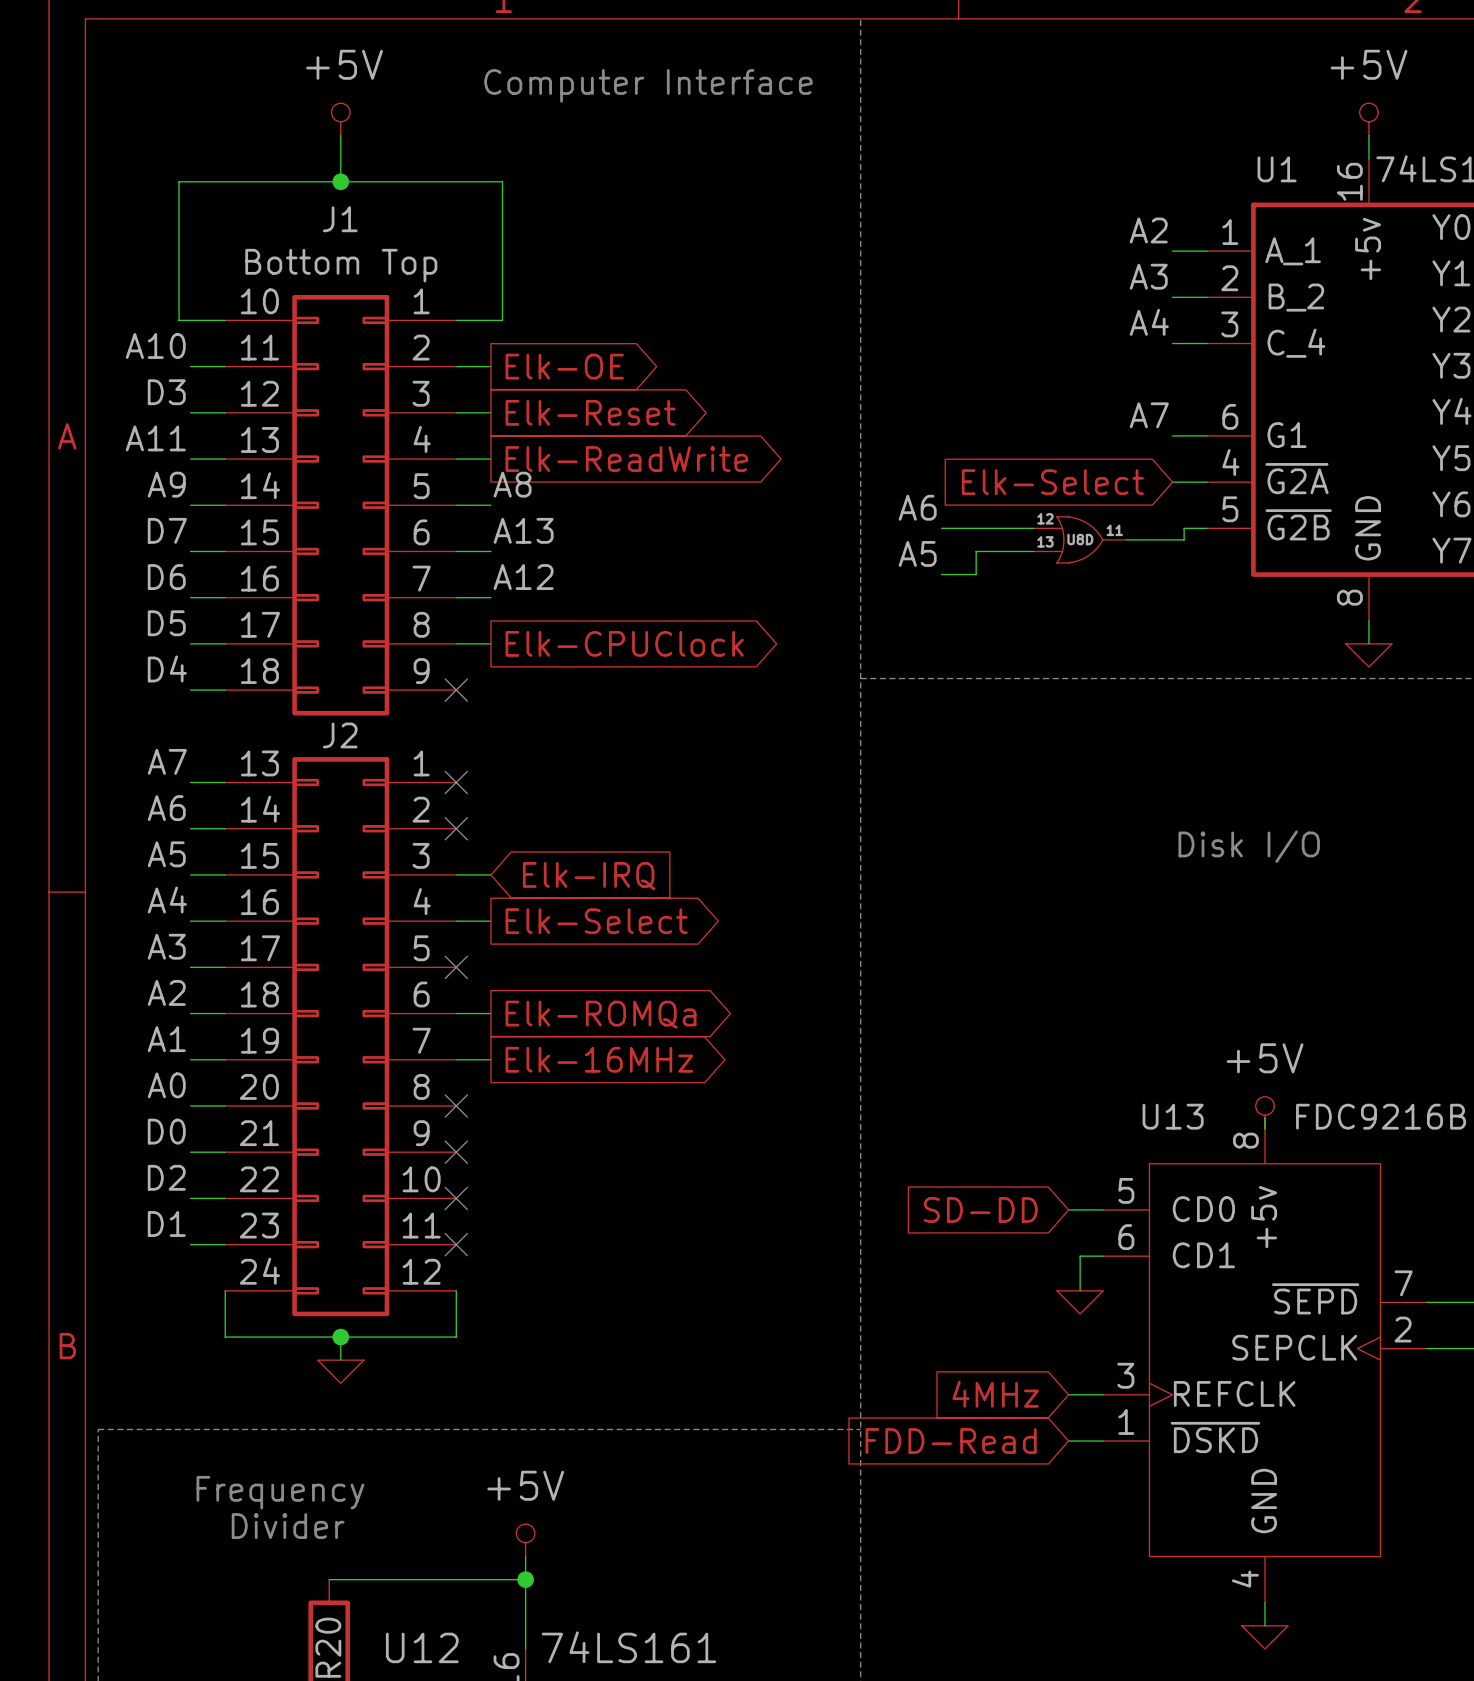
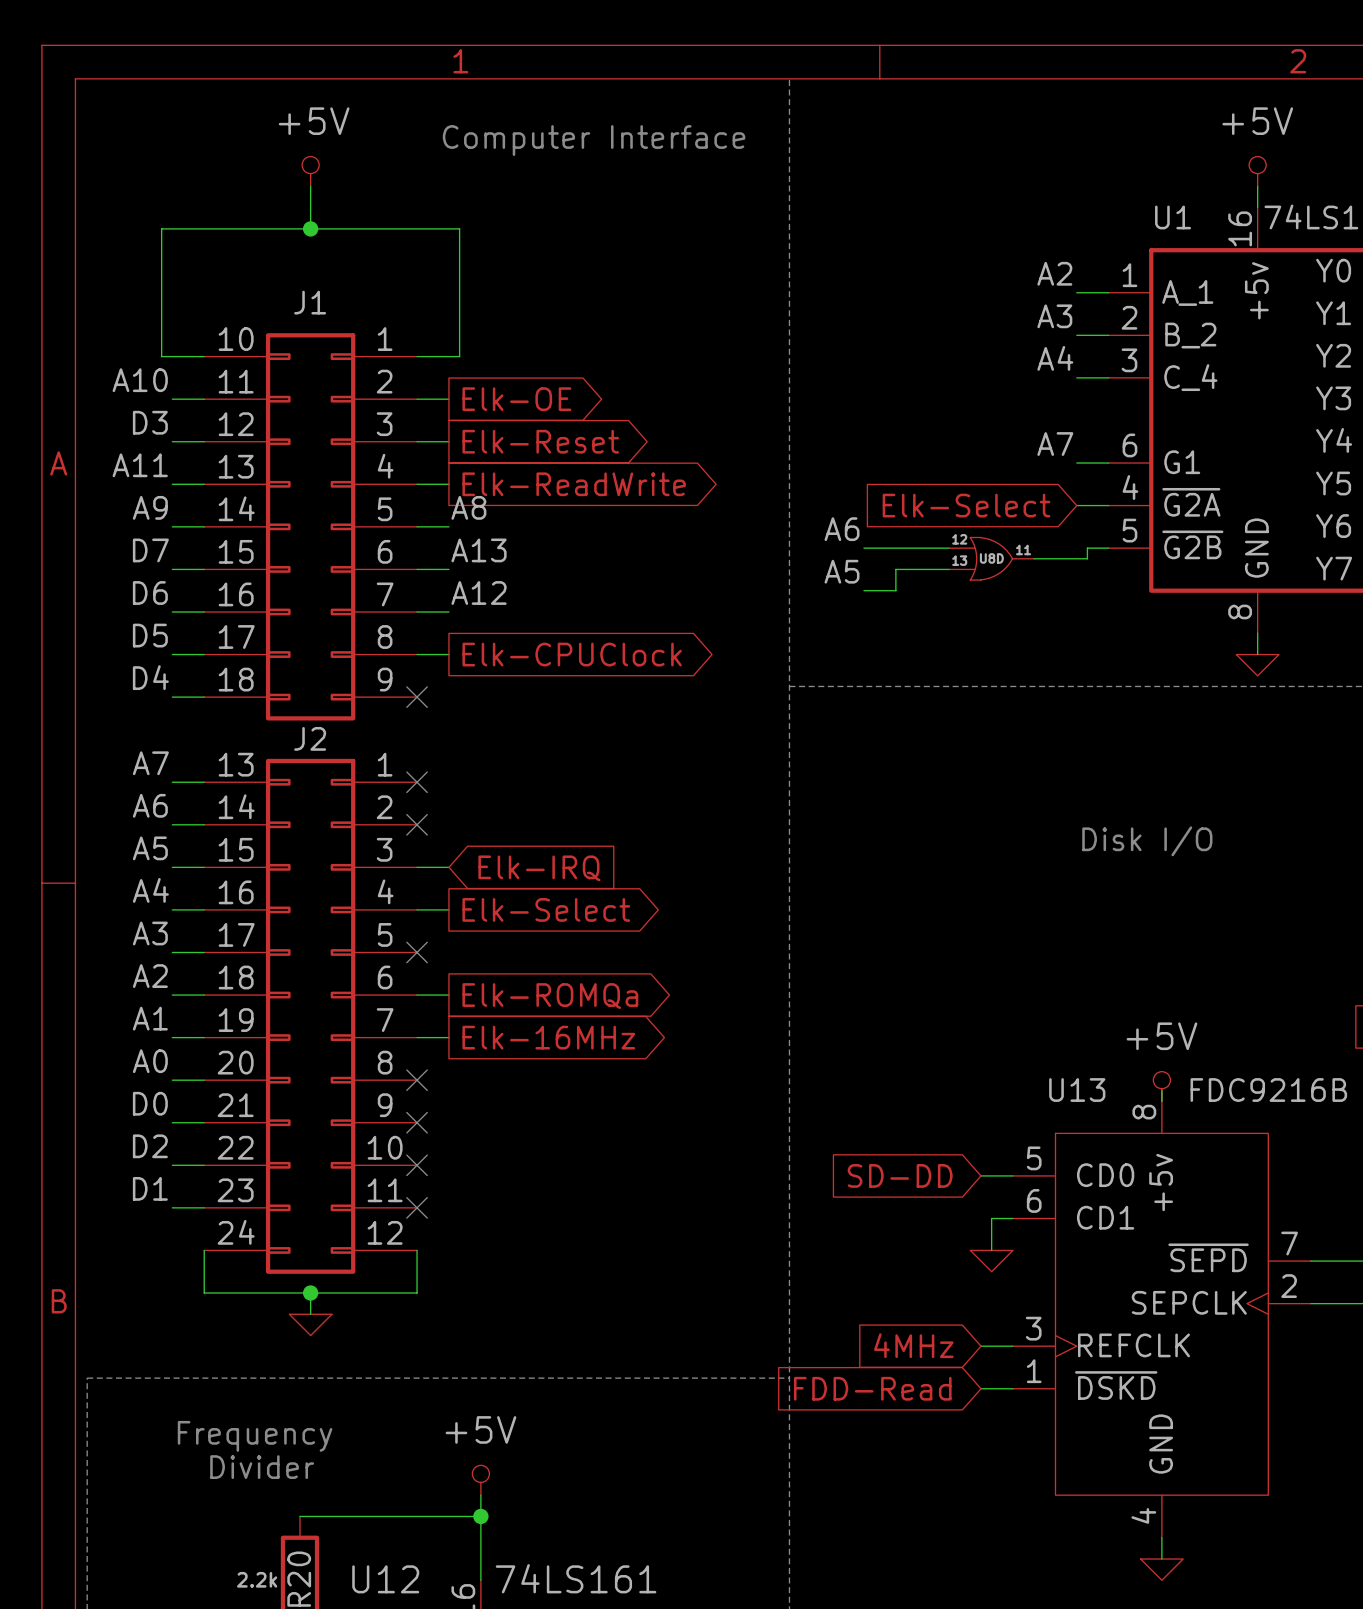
J1 name position: J1 (340, 219) -> J1 (310, 302)
J1 value: Bottom Top (341, 265) -> none
R20 value: none -> 2.2k (257, 1579)

